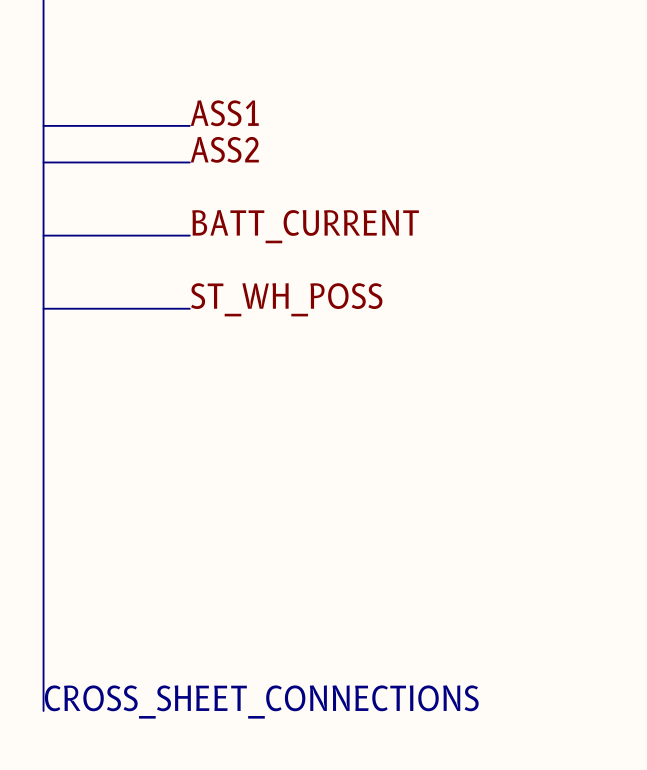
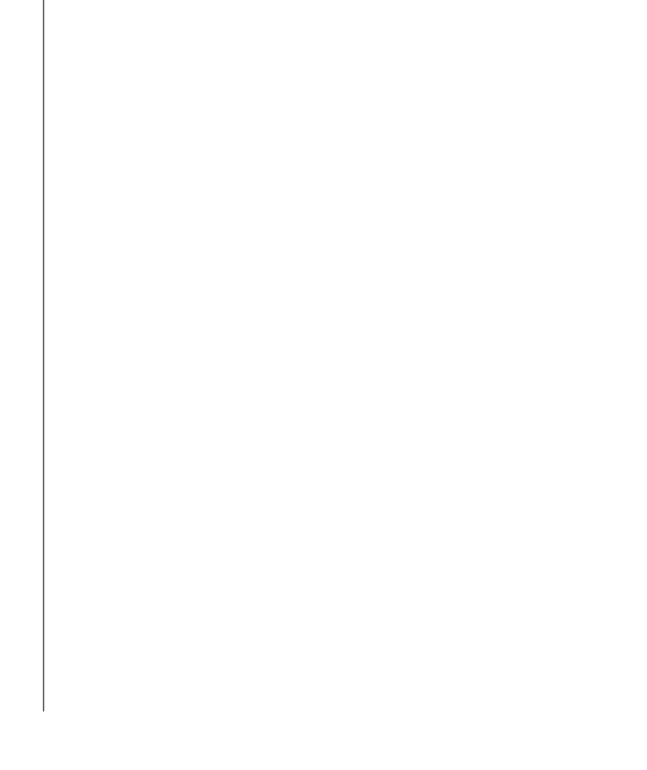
label: ASS1 (224, 113) -> none
wire: (43, 125) (189, 125) -> none
label: ASS2 (224, 149) -> none
wire: (43, 162) (189, 162) -> none
label: BATT_CURRENT (305, 226) -> none
wire: (43, 235) (189, 235) -> none
label: ST_WH_POSS (286, 299) -> none
wire: (43, 308) (189, 308) -> none
text: CROSS_SHEET_CONNECTIONS (261, 701) -> none

